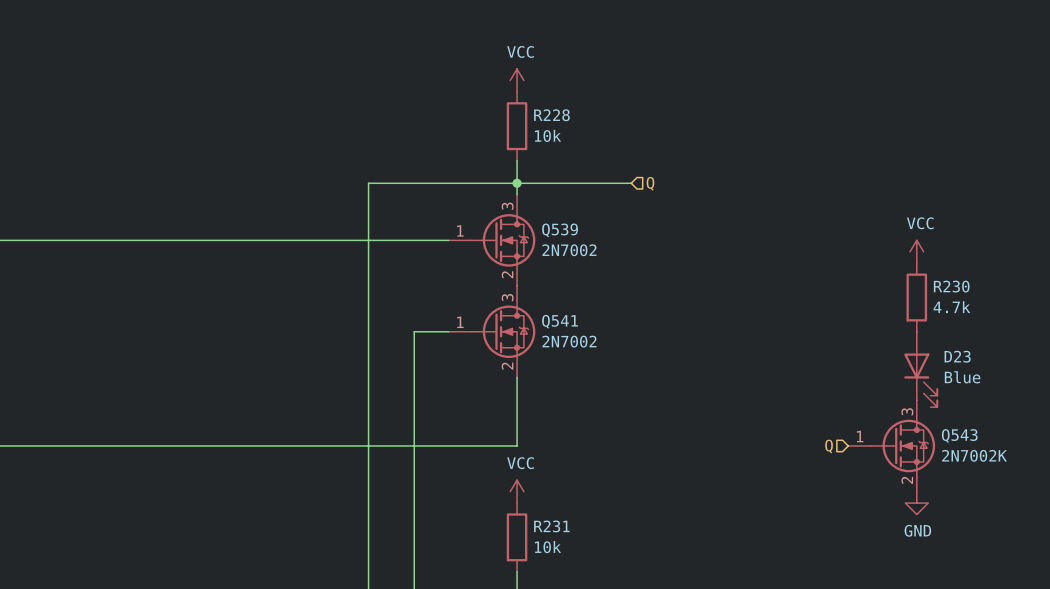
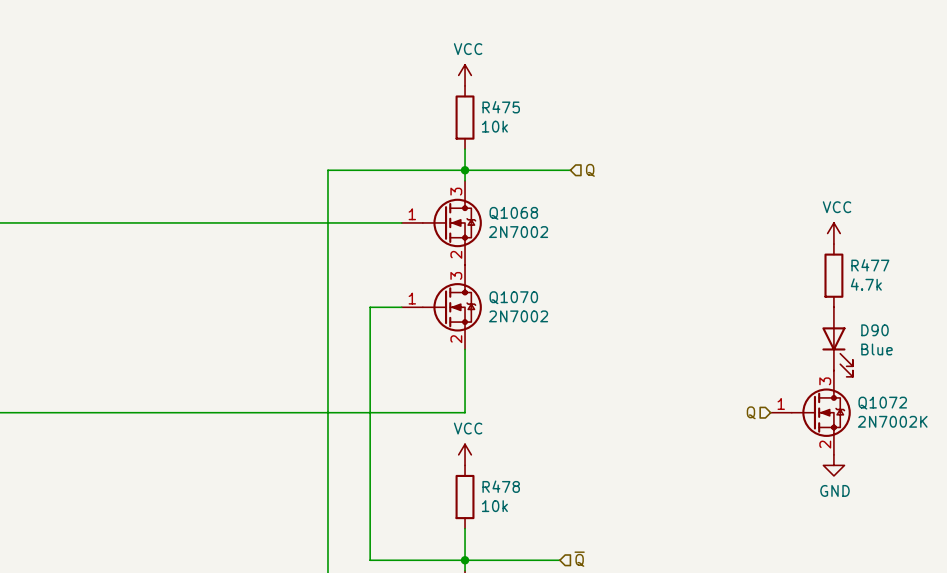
R228 name: R228 (551, 115) -> R475 (501, 107)
Q539 name: Q539 (560, 230) -> Q1068 (513, 213)
R230 name: R230 (951, 286) -> R477 (870, 265)
Q541 name: Q541 (560, 321) -> Q1070 (513, 297)
D23 name: D23 (957, 356) -> D90 (874, 330)
Q543 name: Q543 (959, 435) -> Q1072 (882, 403)
R231 name: R231 (551, 526) -> R478 (501, 486)

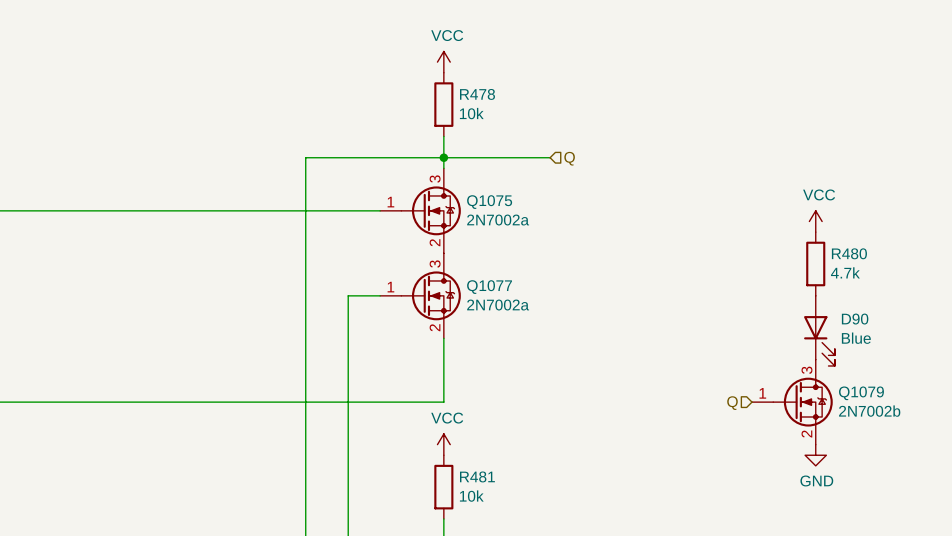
R475 name: R475 (501, 107) -> R478 (477, 94)
Q1068 name: Q1068 (513, 213) -> Q1075 (489, 202)
Q1068 value: 2N7002 (518, 232) -> 2N7002a (498, 220)
R477 name: R477 (870, 265) -> R480 (849, 253)
Q1070 name: Q1070 (513, 297) -> Q1077 (489, 287)
Q1070 value: 2N7002 (518, 316) -> 2N7002a (498, 305)
Q1072 name: Q1072 (882, 403) -> Q1079 (861, 393)
Q1072 value: 2N7002K (892, 421) -> 2N7002b (869, 411)
R478 name: R478 (501, 486) -> R481 (477, 476)

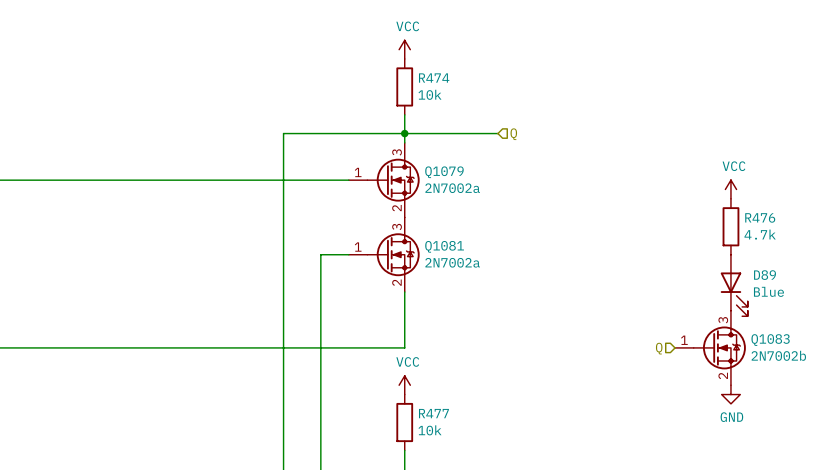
R478 name: R478 (477, 94) -> R474 (434, 78)
Q1075 name: Q1075 (489, 202) -> Q1079 (444, 172)
R480 name: R480 (849, 253) -> R476 (760, 217)
Q1077 name: Q1077 (489, 287) -> Q1081 (444, 246)
D90 name: D90 (855, 319) -> D89 (765, 275)
Q1079 name: Q1079 (861, 393) -> Q1083 (770, 340)
R481 name: R481 (477, 476) -> R477 (433, 413)

